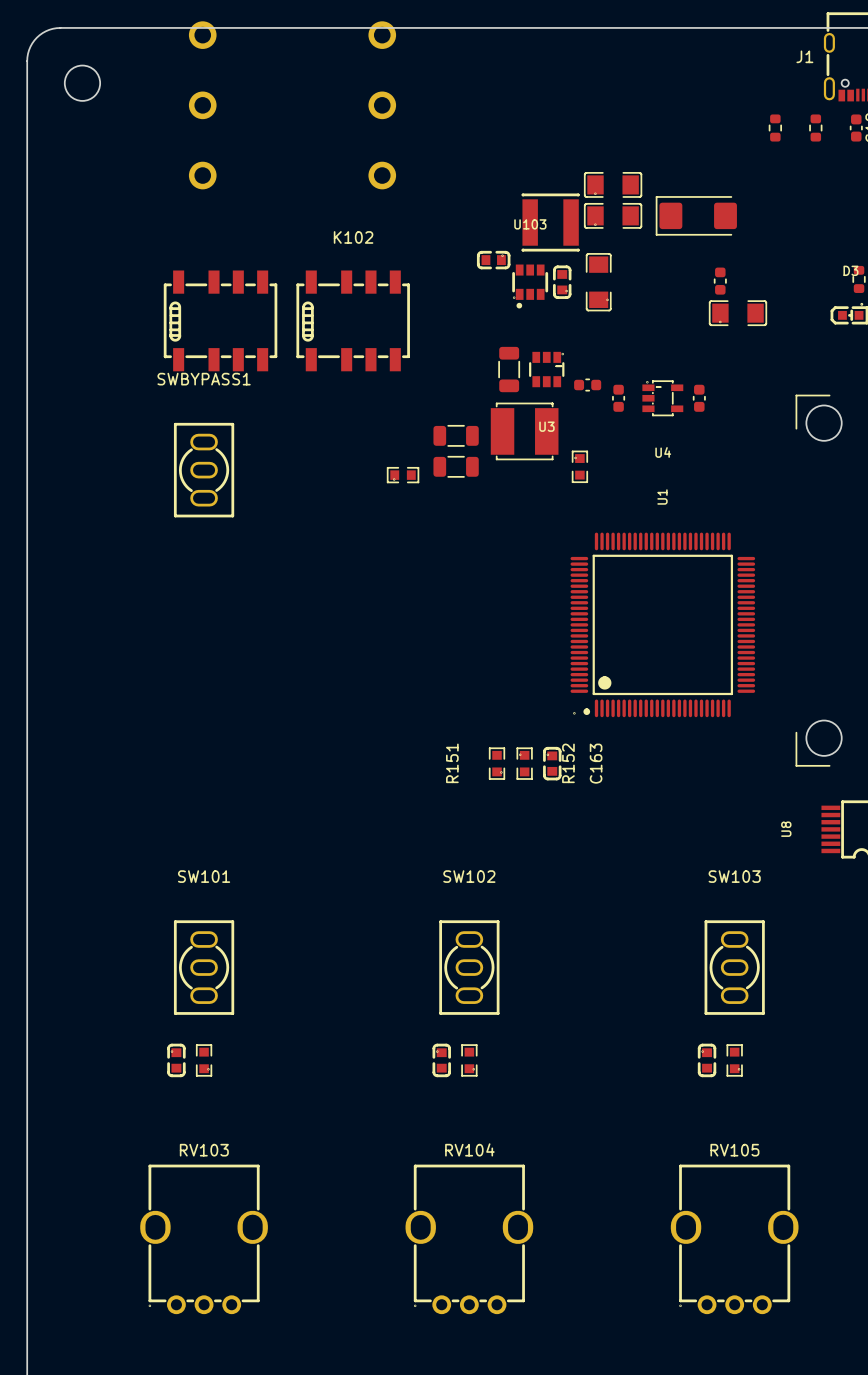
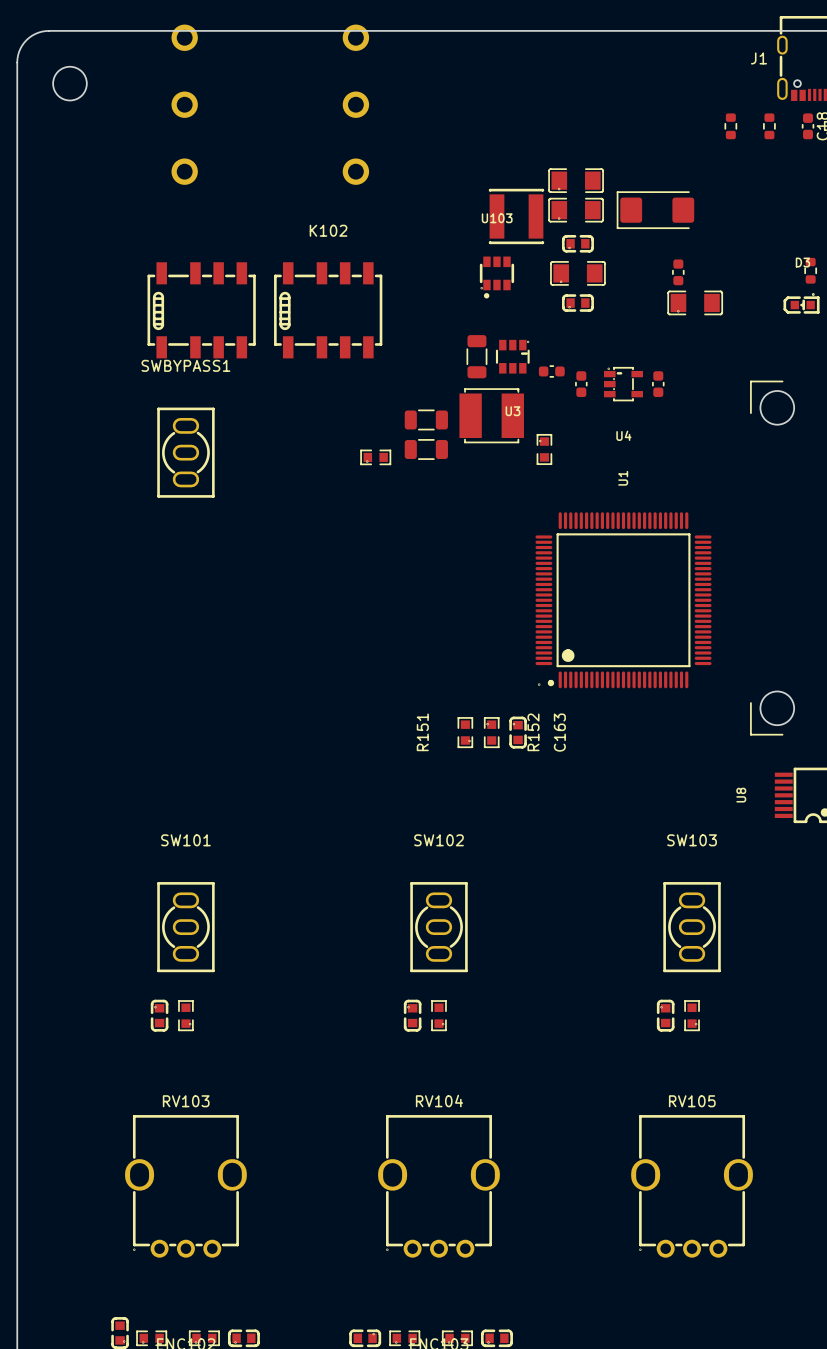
part: none -> (577, 243)
part: (493, 260) -> none
part: (562, 282) -> none
part rotation: 0° (598, 282) -> 90° clockwise (577, 273)
part: none -> (577, 303)

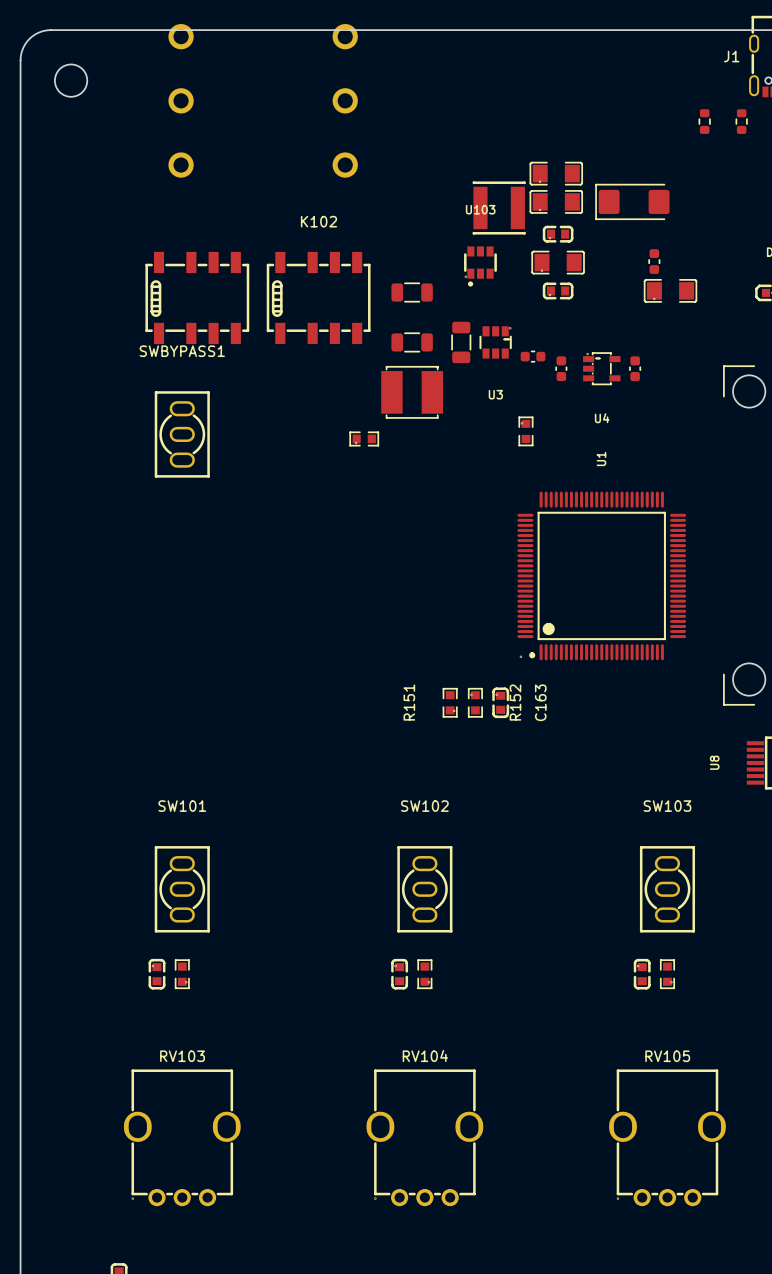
part: none -> (412, 292)
part: none -> (412, 342)
part position: (491, 415) -> (412, 392)
part: (426, 419) -> none
part: (426, 449) -> none

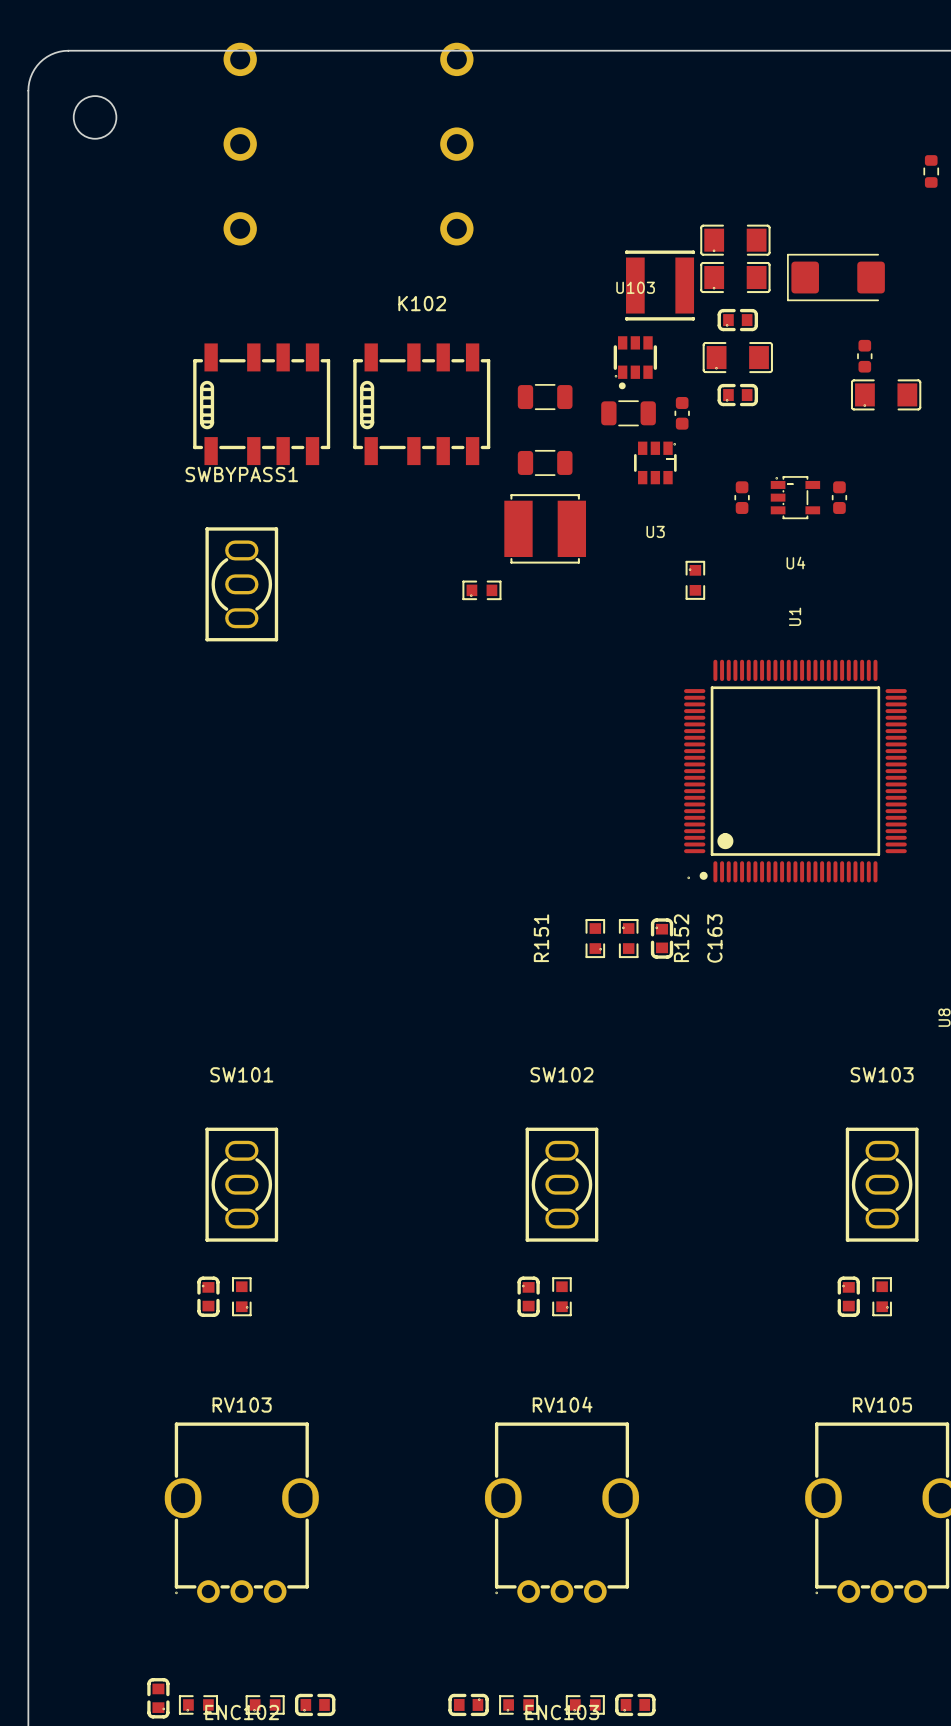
part rotation: 0° (461, 342) -> 90° clockwise (628, 413)
part position: (461, 342) -> (628, 413)
part rotation: 0° (533, 356) -> 90° clockwise (682, 413)
part position: (533, 356) -> (682, 413)

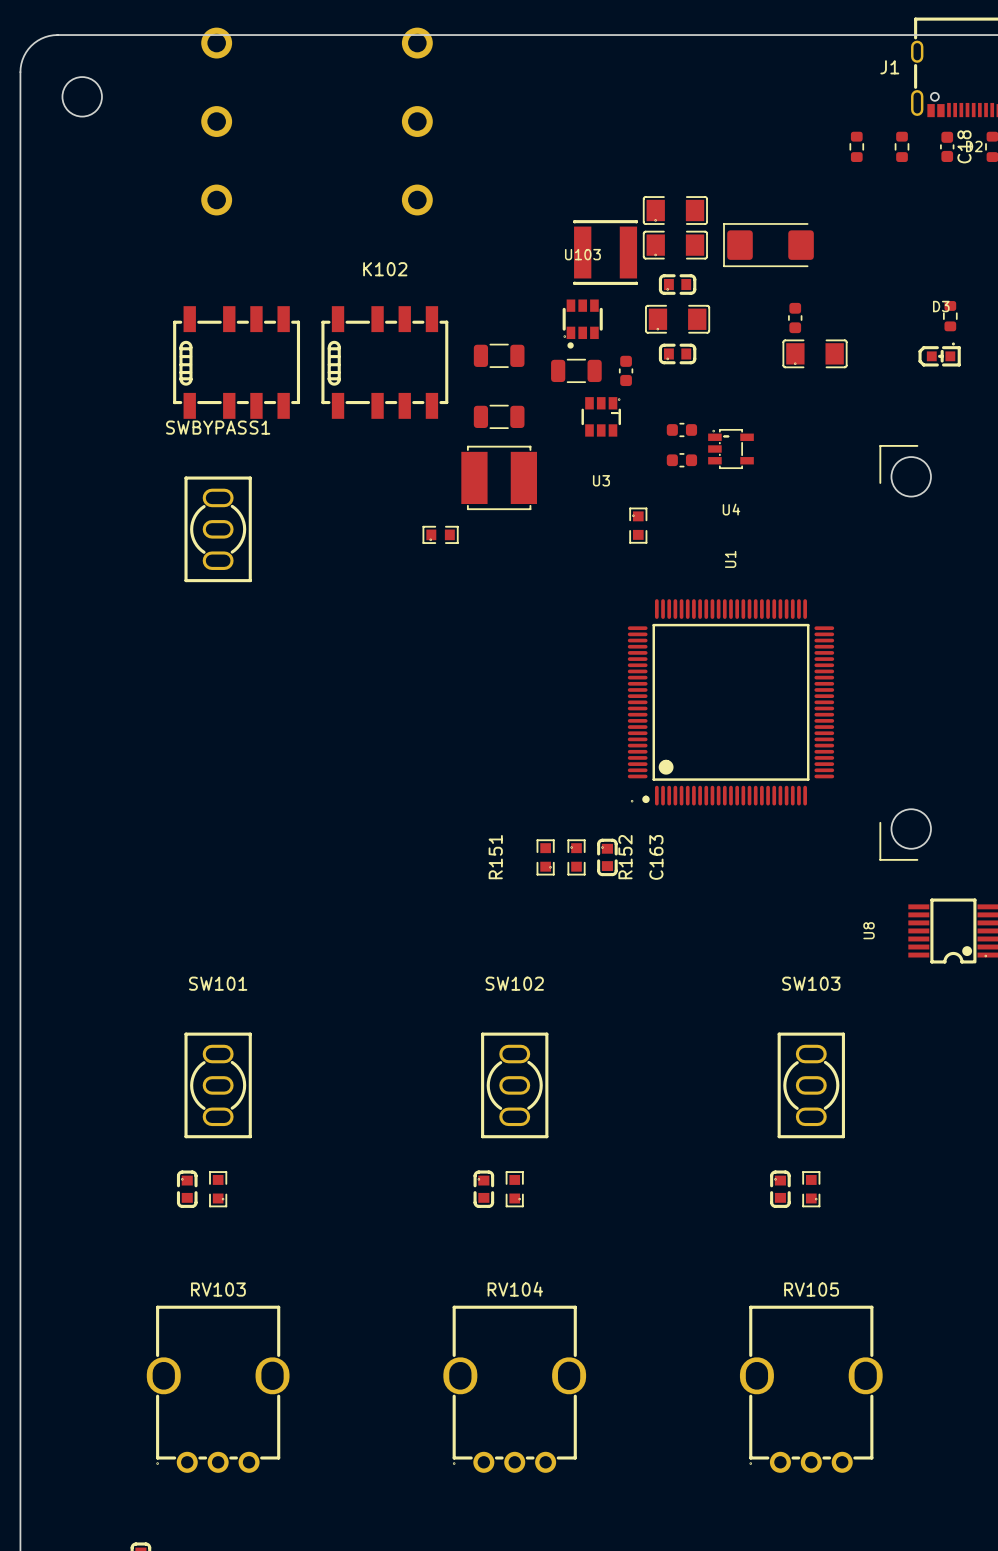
part: none -> (681, 429)
part: (742, 497) -> none
part: (839, 497) -> none
part: none -> (681, 460)

